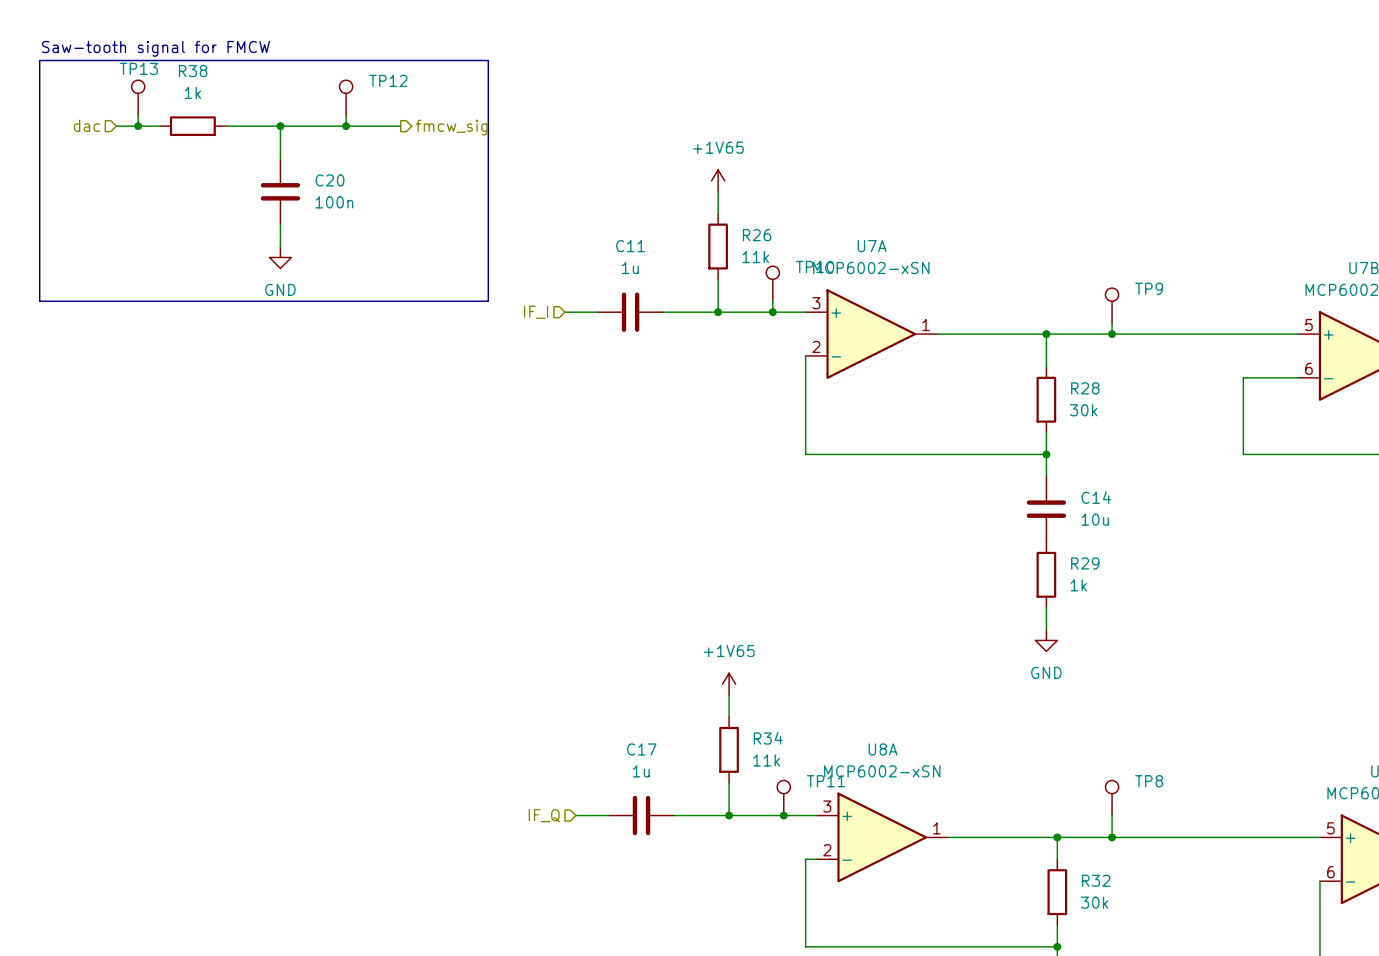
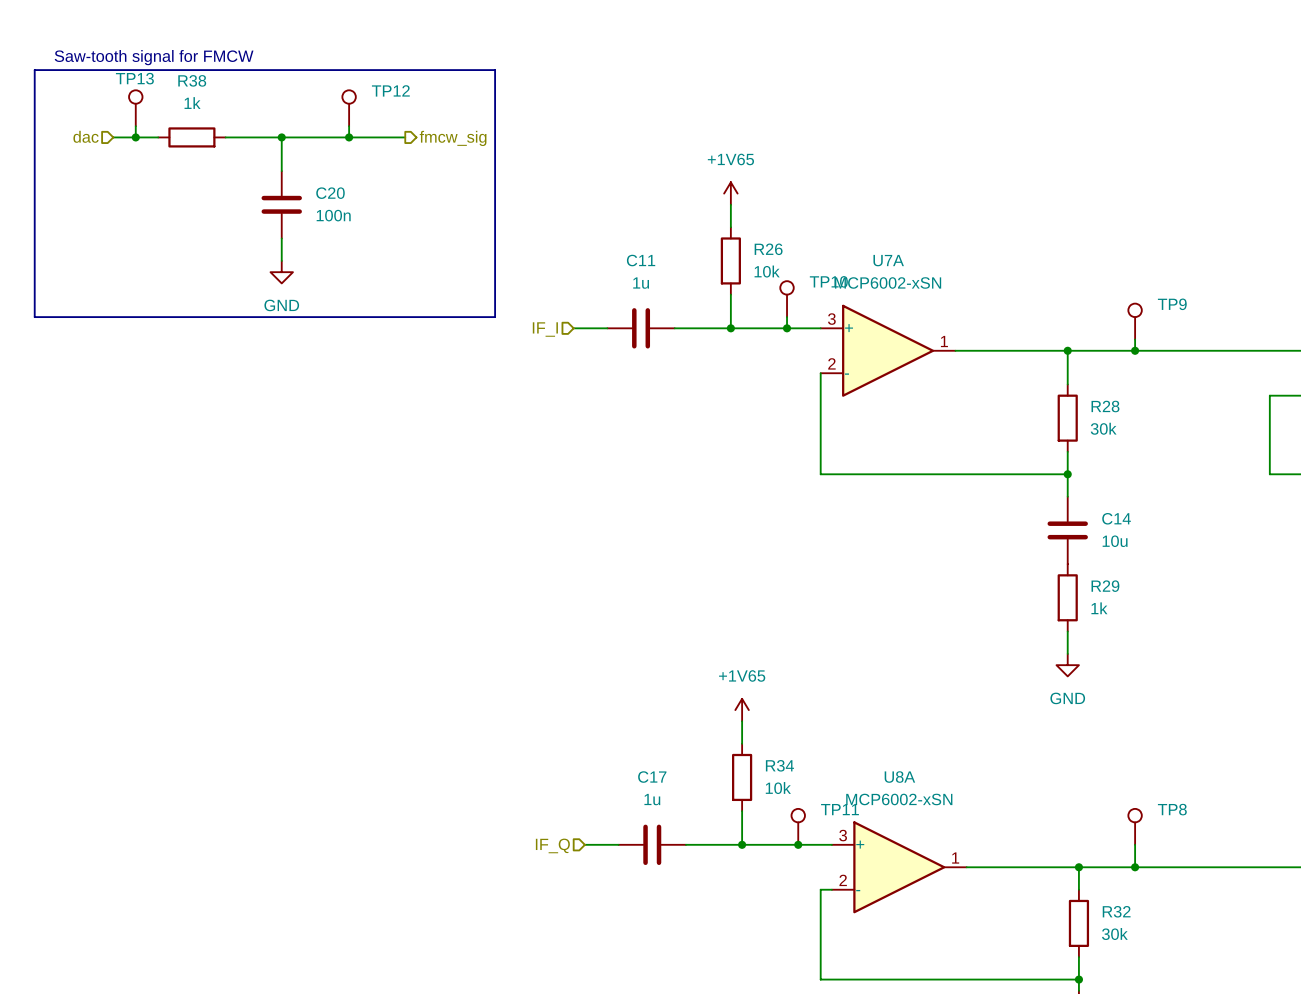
R26 value: 11k (755, 257) -> 10k (767, 271)
R34 value: 11k (766, 760) -> 10k (778, 788)

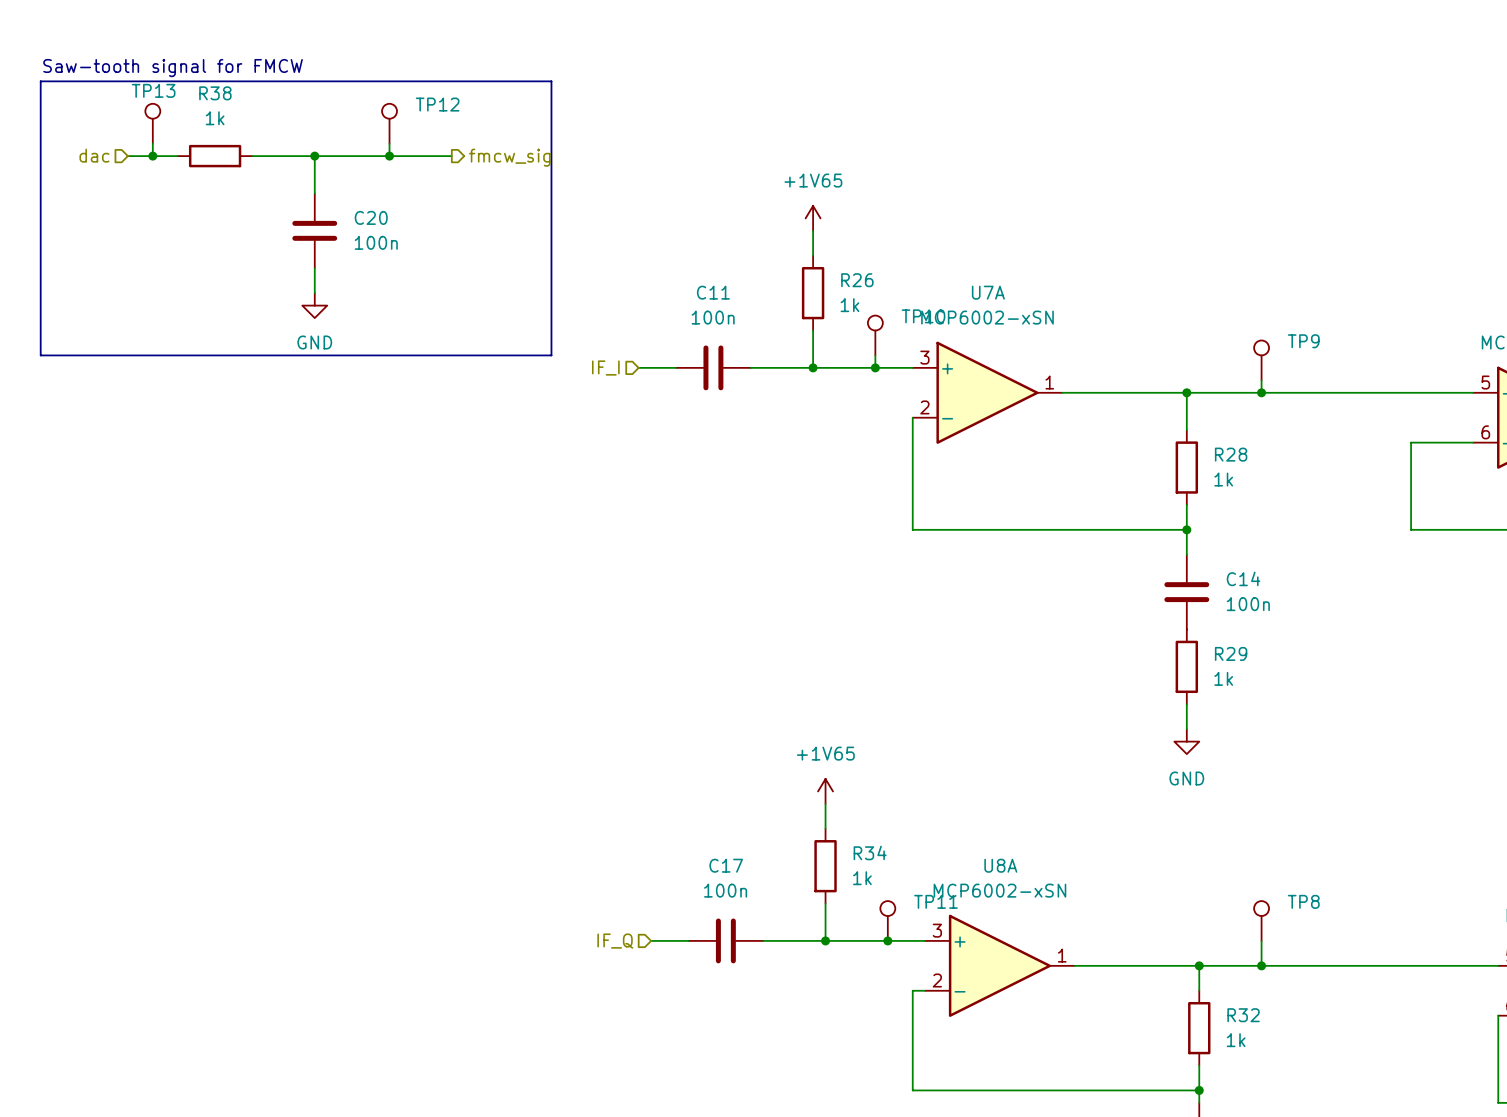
R26 value: 10k (767, 271) -> 1k (849, 305)
C11 value: 1u (641, 283) -> 100n (713, 317)
R28 value: 30k (1103, 428) -> 1k (1223, 479)
C14 value: 10u (1115, 541) -> 100n (1248, 604)
R34 value: 10k (778, 788) -> 1k (862, 878)
C17 value: 1u (652, 799) -> 100n (725, 890)
R32 value: 30k (1114, 934) -> 1k (1236, 1040)

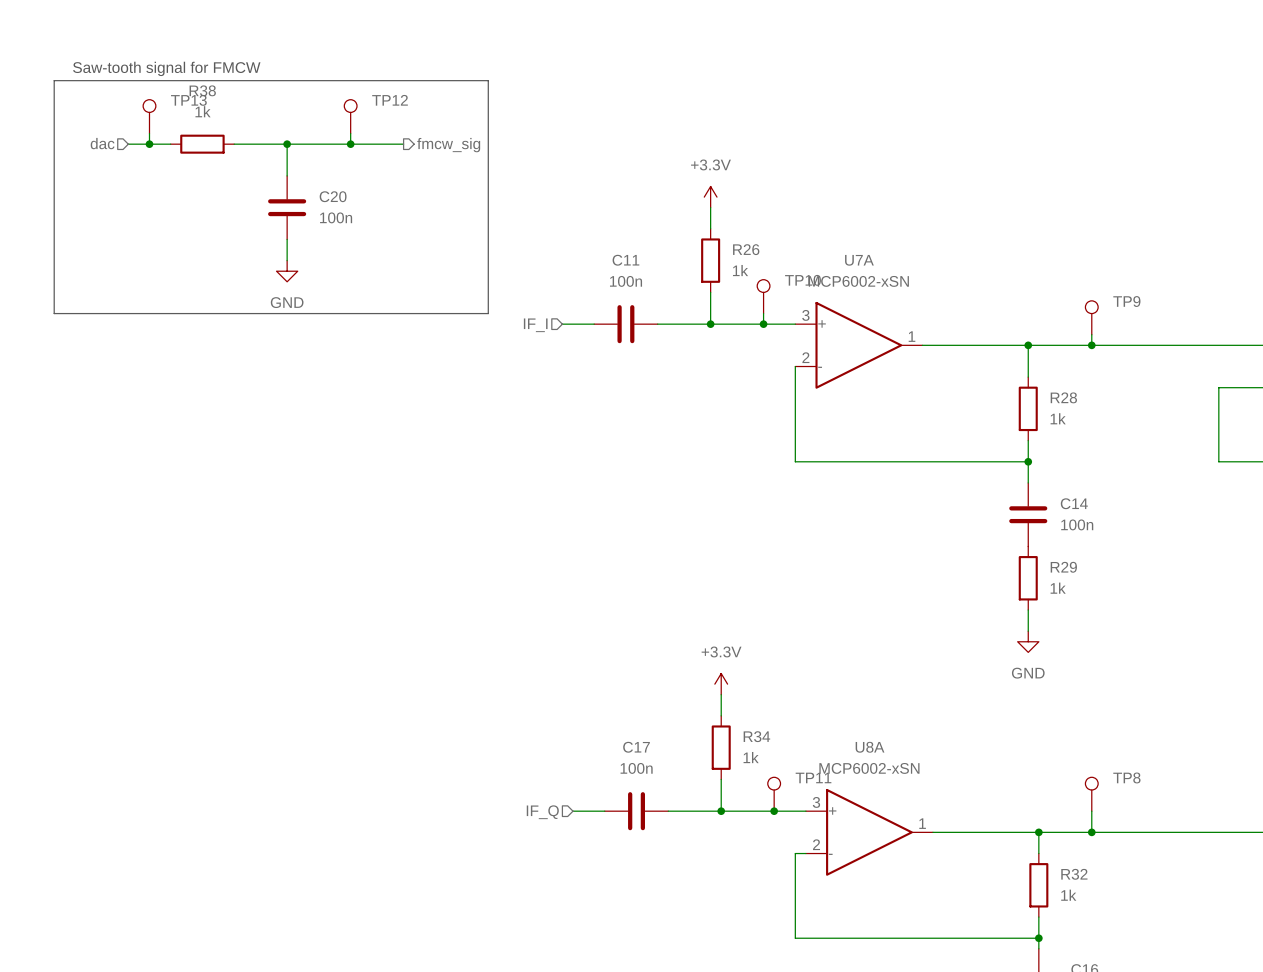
TP13 name position: TP13 (153, 90) -> TP13 (188, 100)
power symbol: +1V65 (813, 218) -> +3.3V (710, 197)
power symbol: +1V65 (825, 791) -> +3.3V (721, 684)

